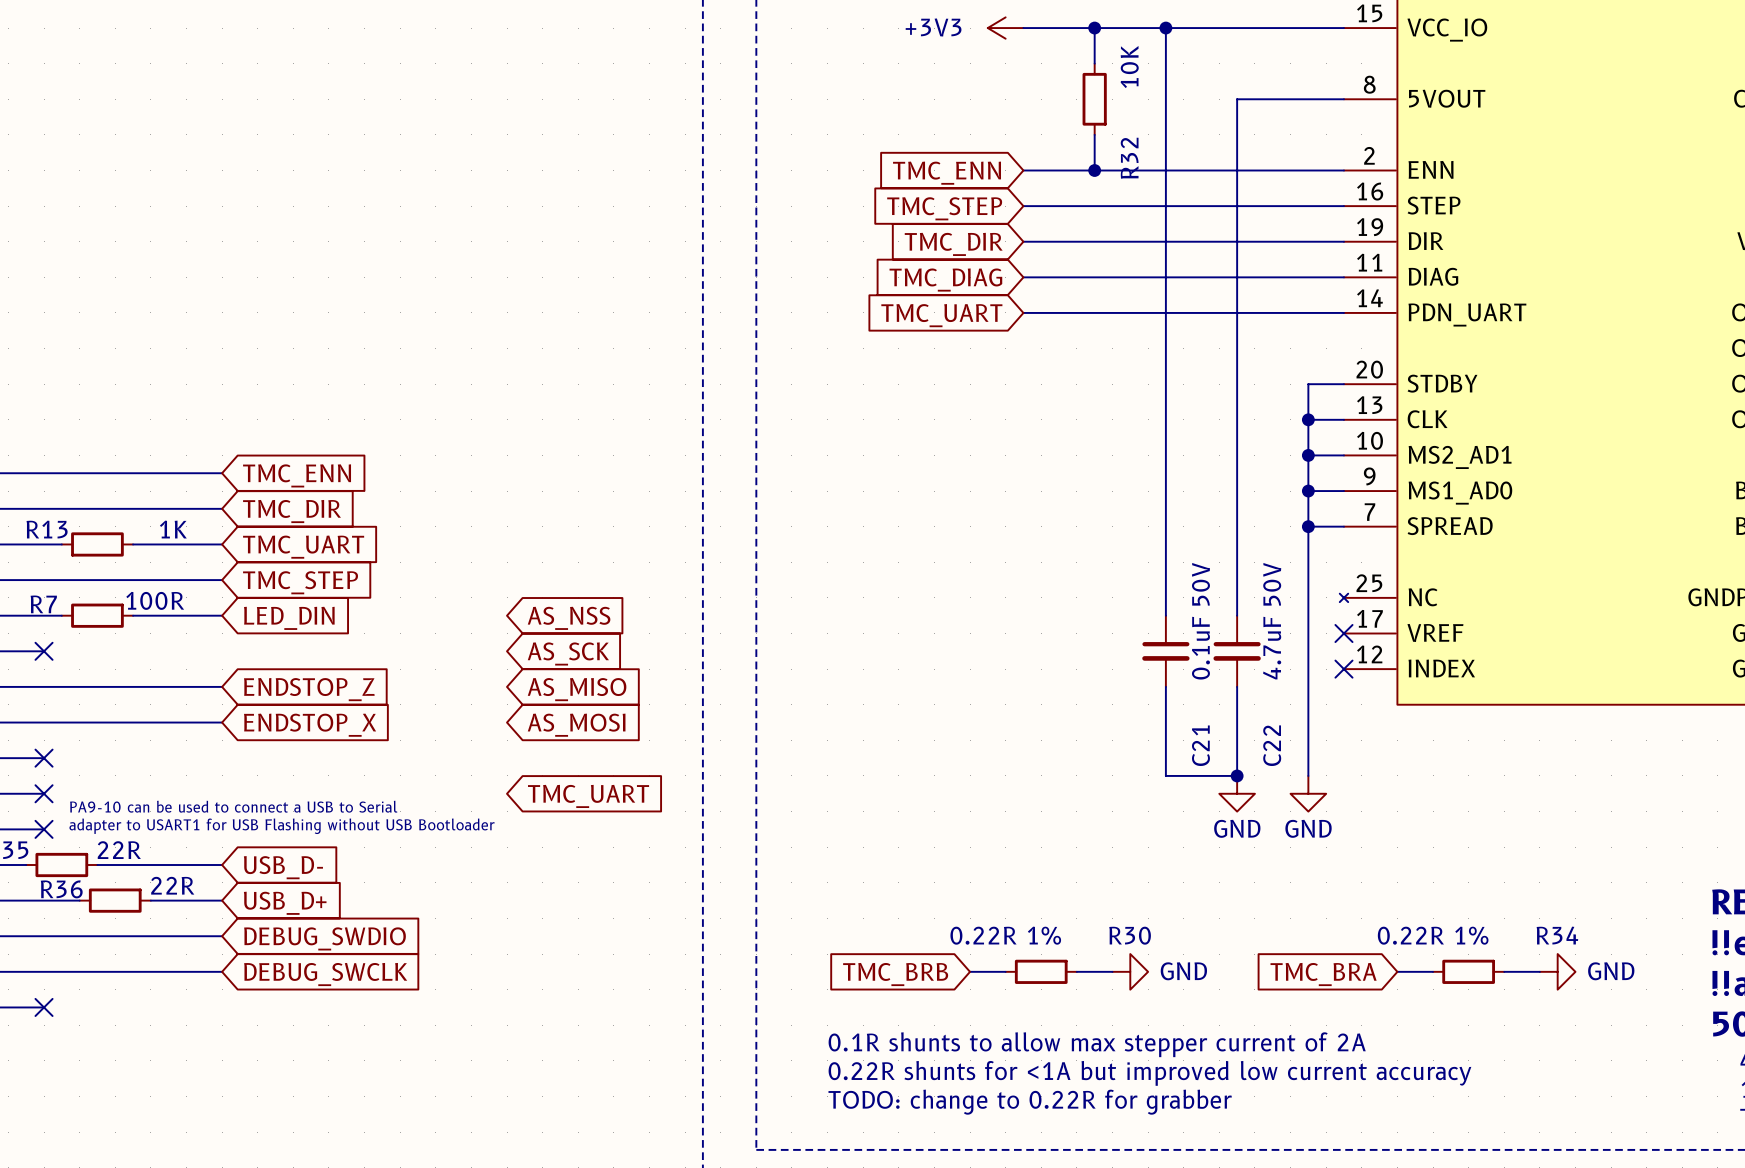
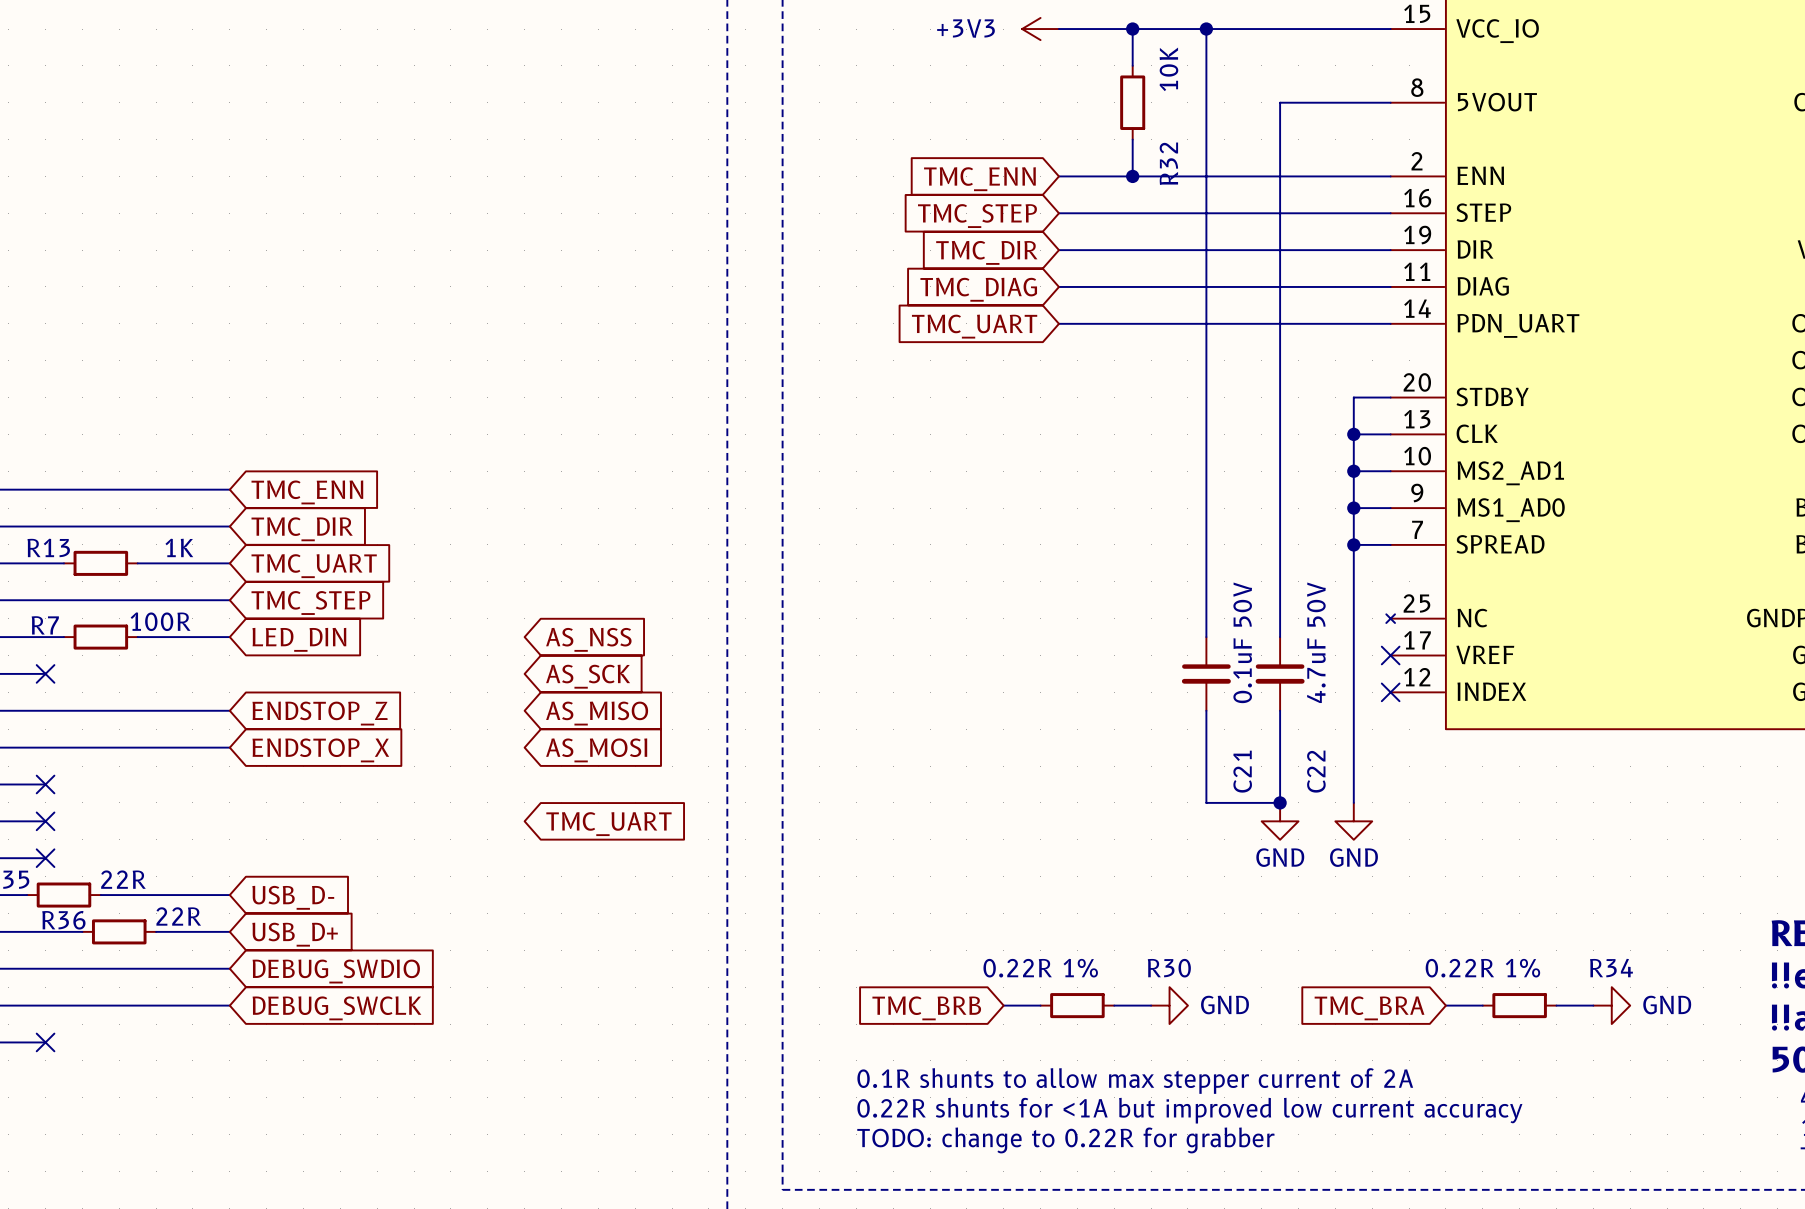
text: PA9-10 can be used to connect a USB to Serial (233, 806) -> none
text: adapter to USART1 for USB Flashing without USB Bootloader (282, 826) -> none

